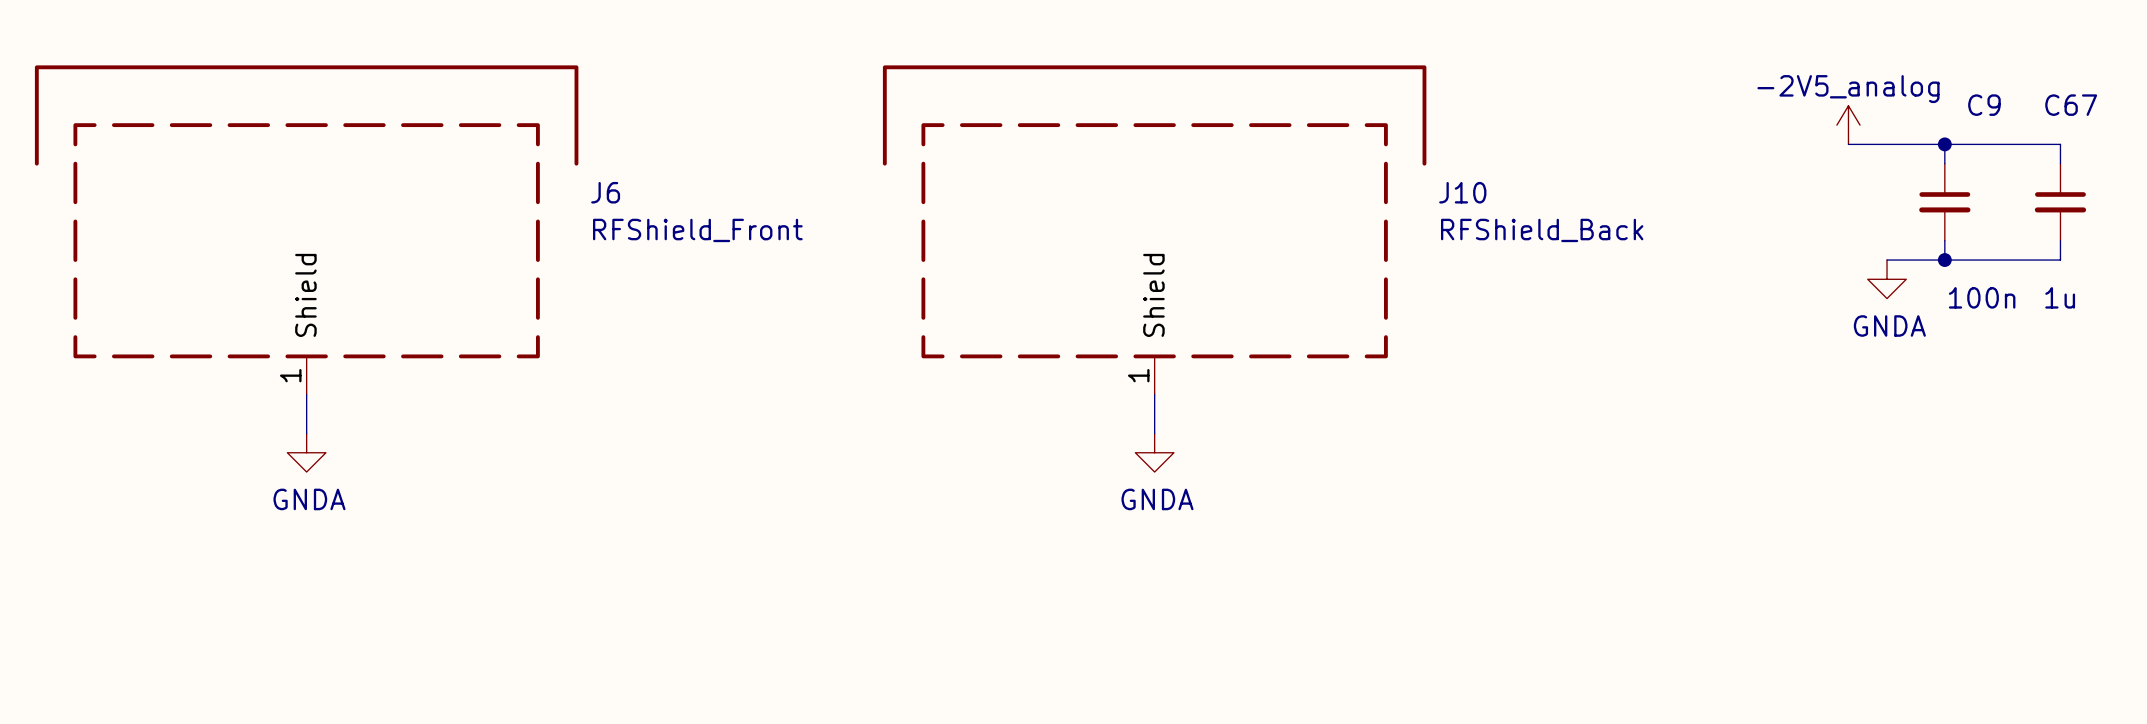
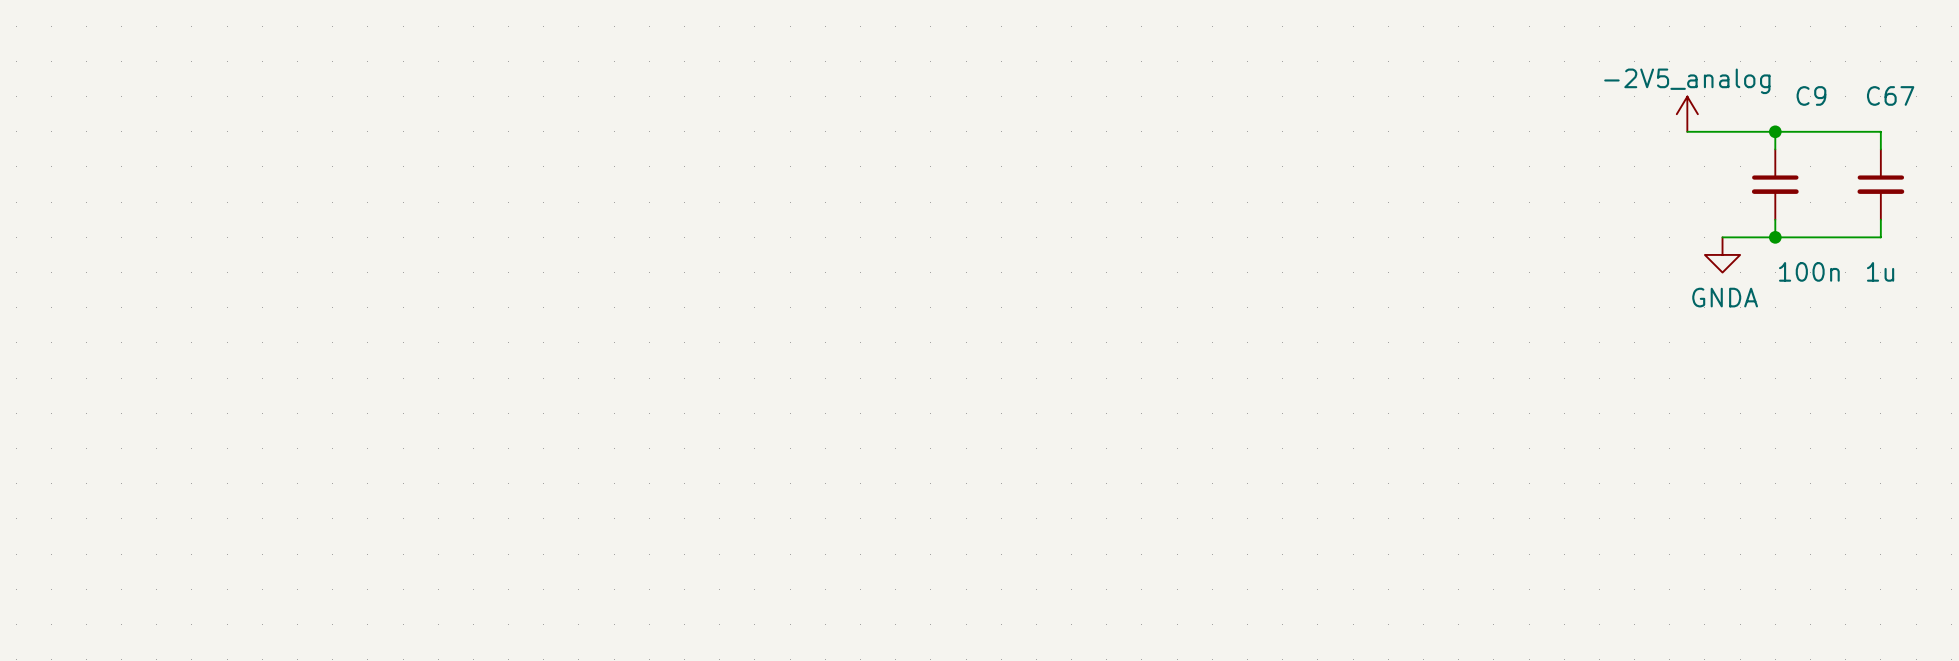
J6: RFShield_Front (306, 230) -> none
J10: RFShield_Back (1154, 230) -> none
wire: (306, 394) (306, 433) -> none
wire: (1154, 394) (1154, 433) -> none
power symbol: GNDA (306, 452) -> none
power symbol: GNDA (1154, 452) -> none

